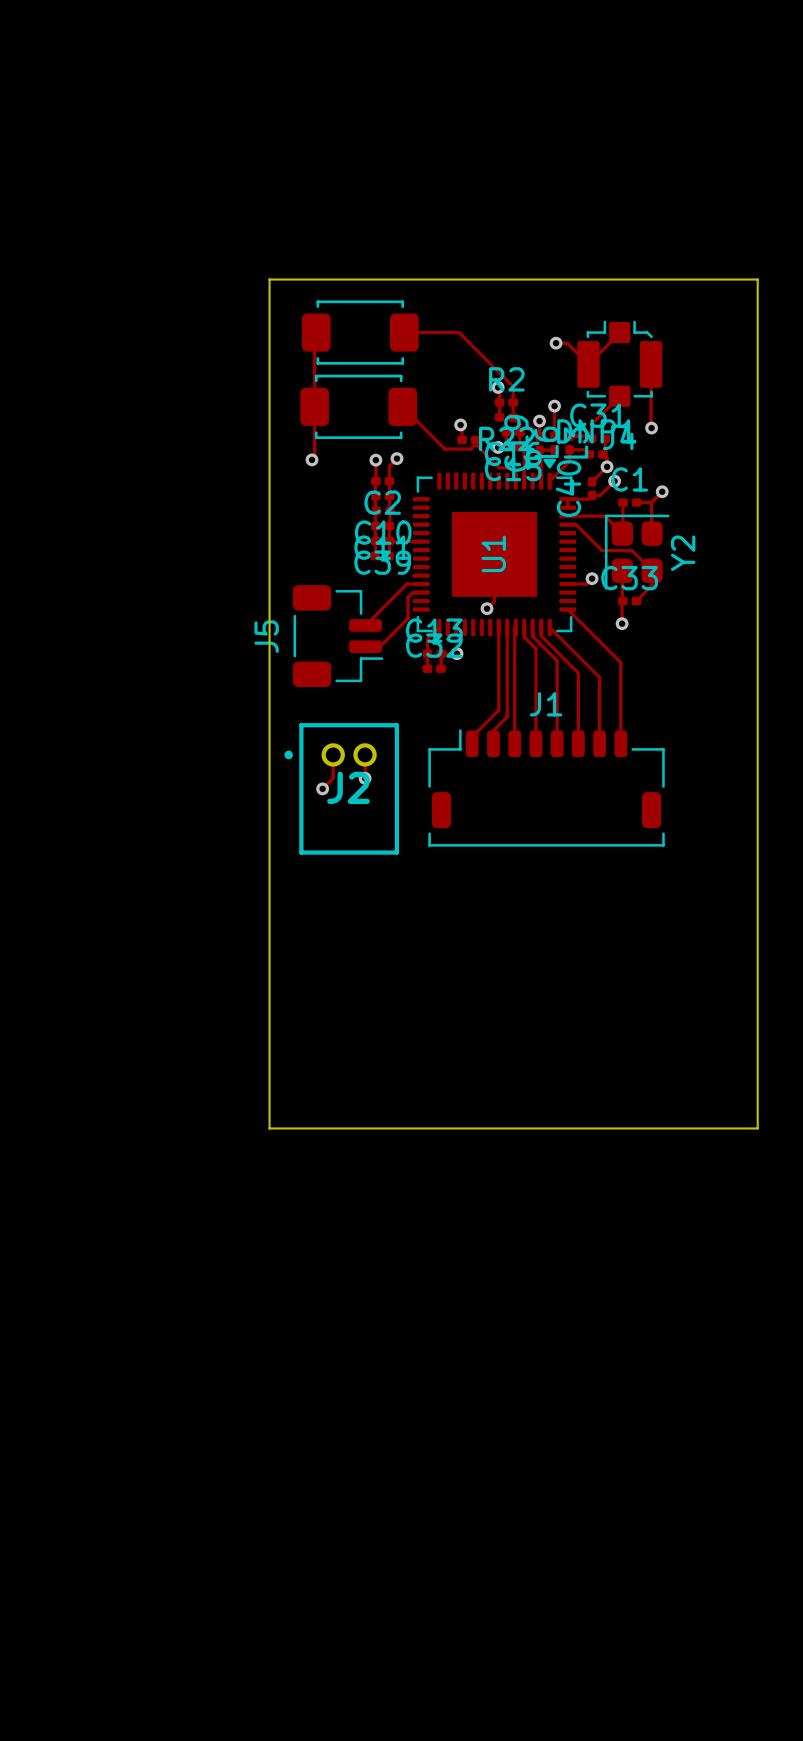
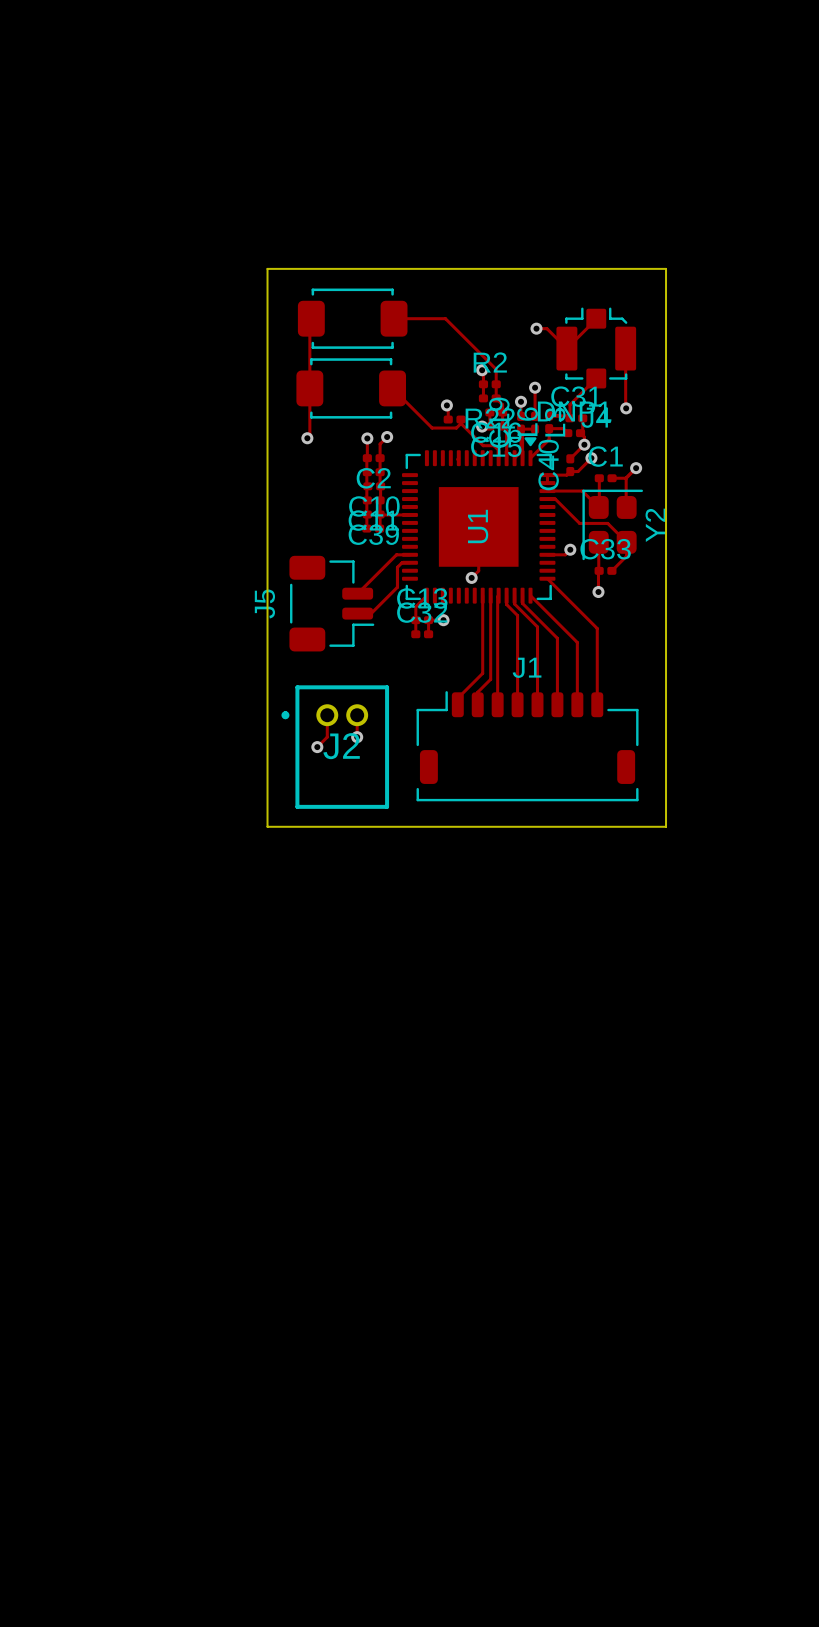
board edge: (694, 279) (757, 279) (757, 1128) (269, 1128) (269, 873) -> (666, 268) (666, 826) (267, 826)

